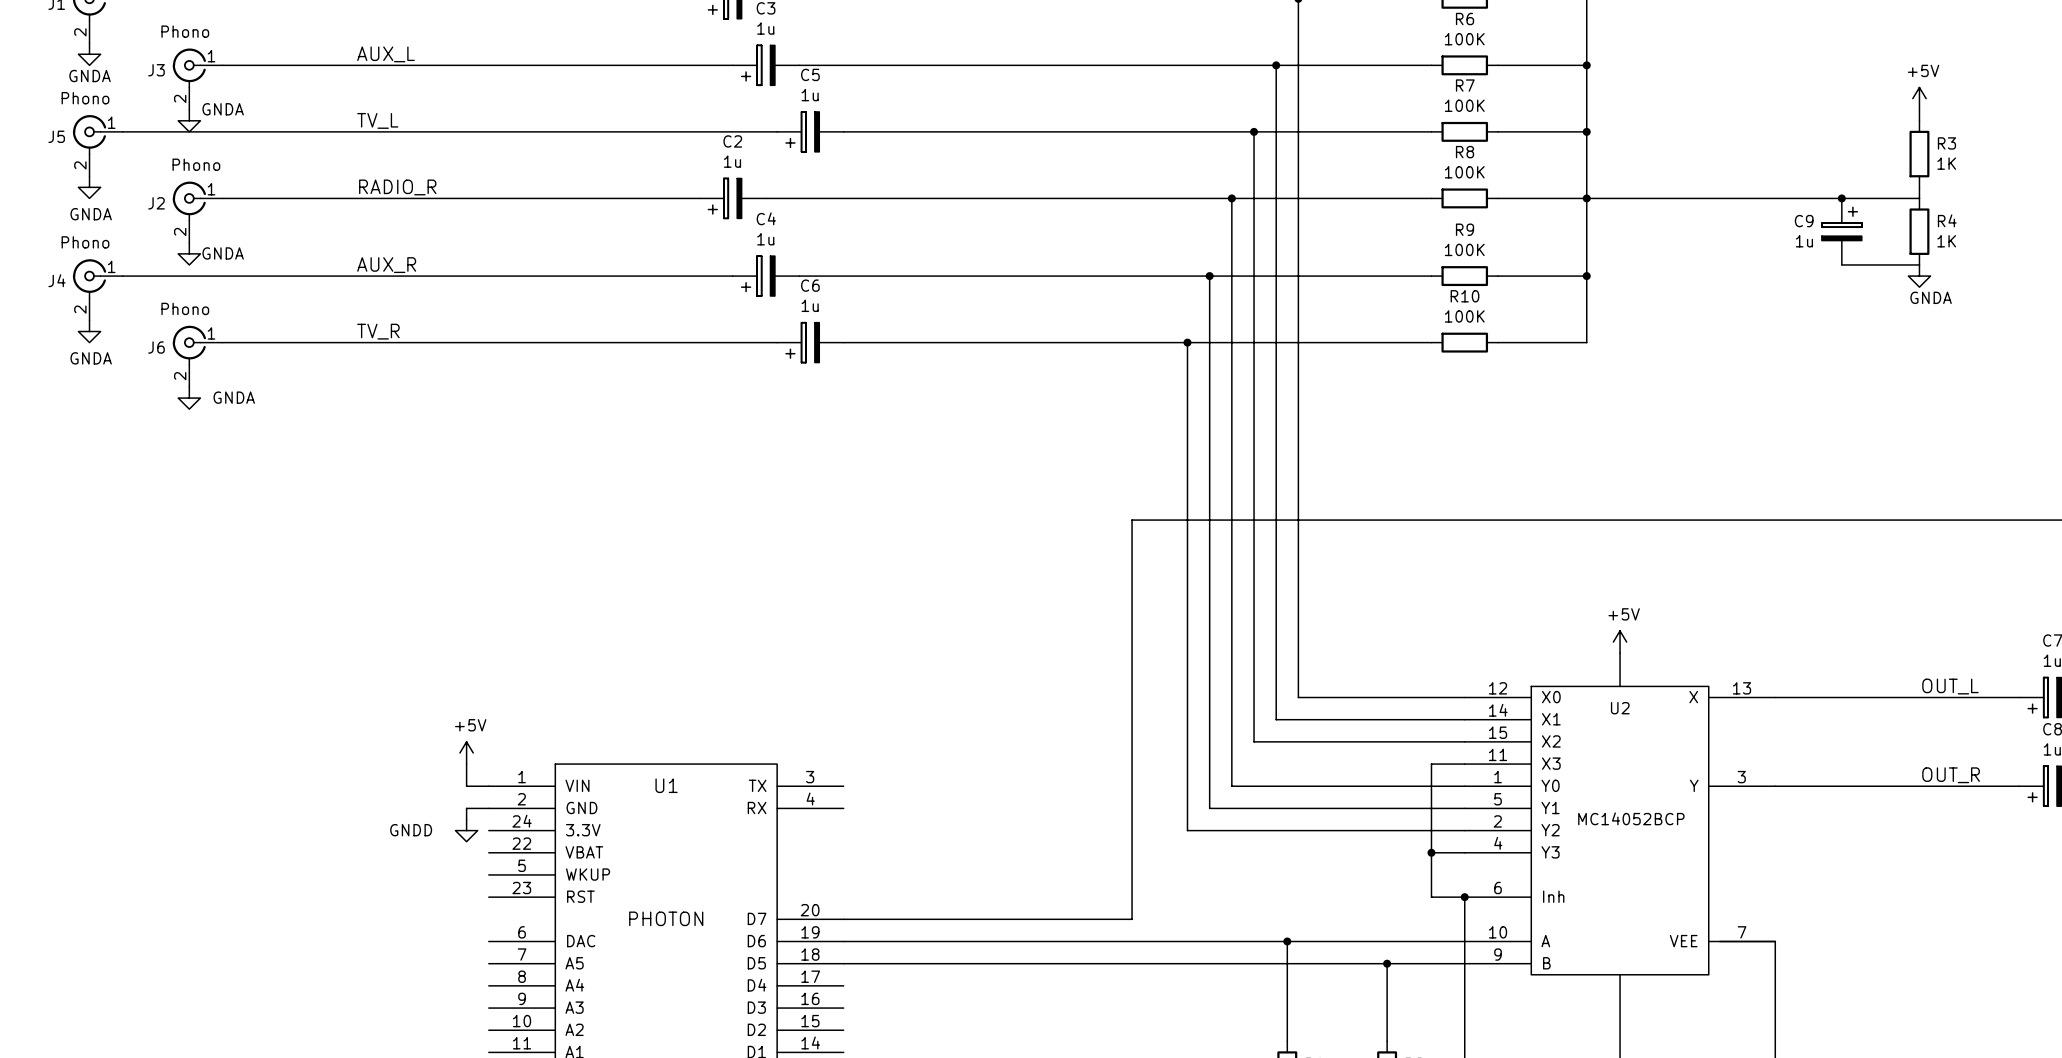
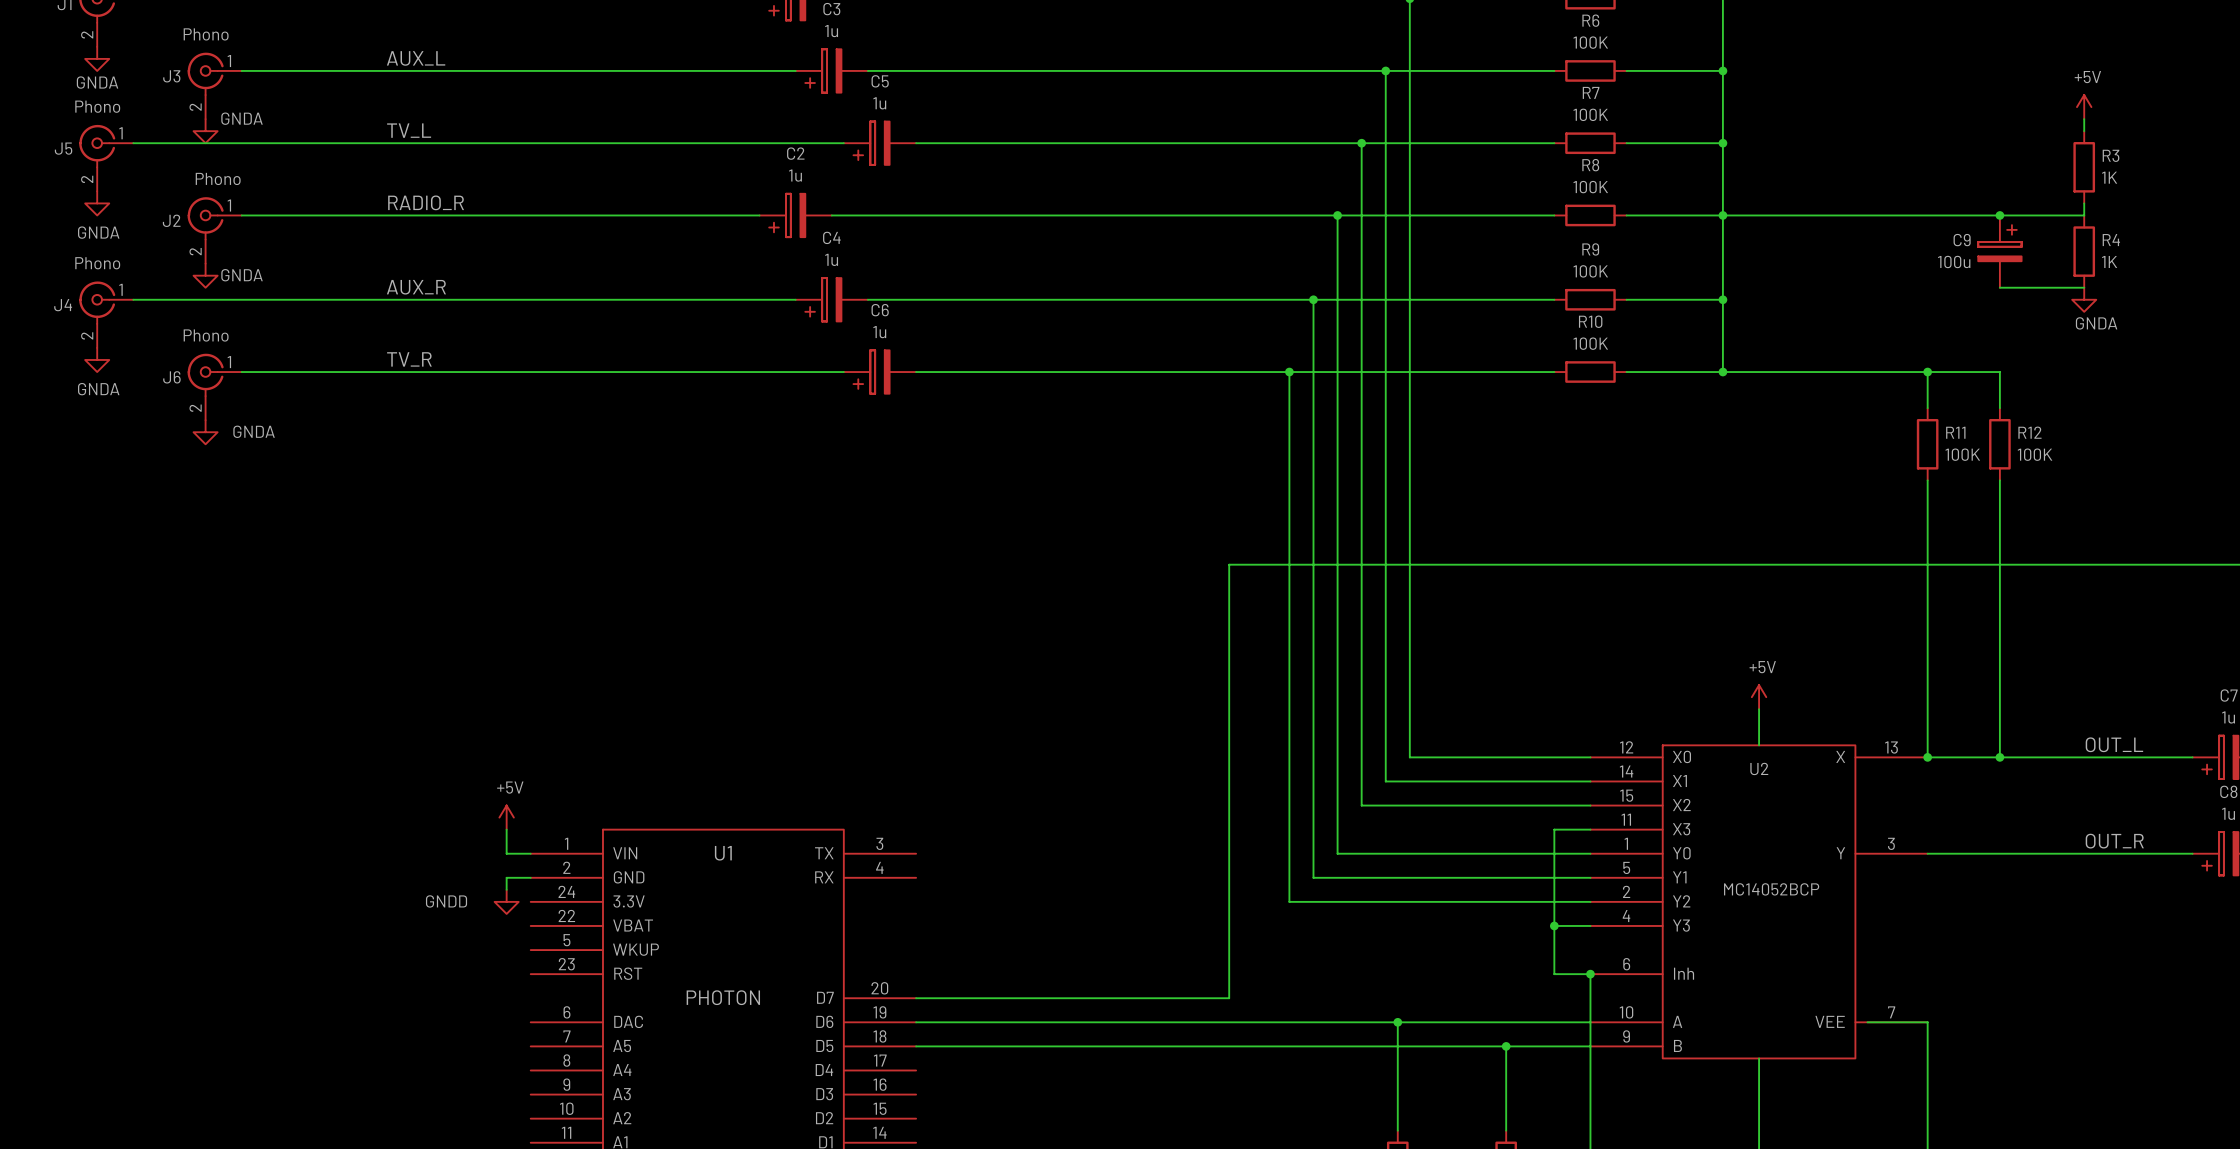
C9 value: 1u (1804, 241) -> 100u (1954, 261)
wire: none -> (1722, 372) (1999, 372) (1999, 408)
junction: none -> (1722, 372)
wire: none -> (1927, 372) (1927, 408)
junction: none -> (1927, 372)
R11: none -> 100K (1927, 444)
R12: none -> 100K (1999, 444)
wire: none -> (1927, 480) (1927, 757)
wire: none -> (1999, 480) (1999, 757)
junction: none -> (1927, 757)
junction: none -> (1999, 757)

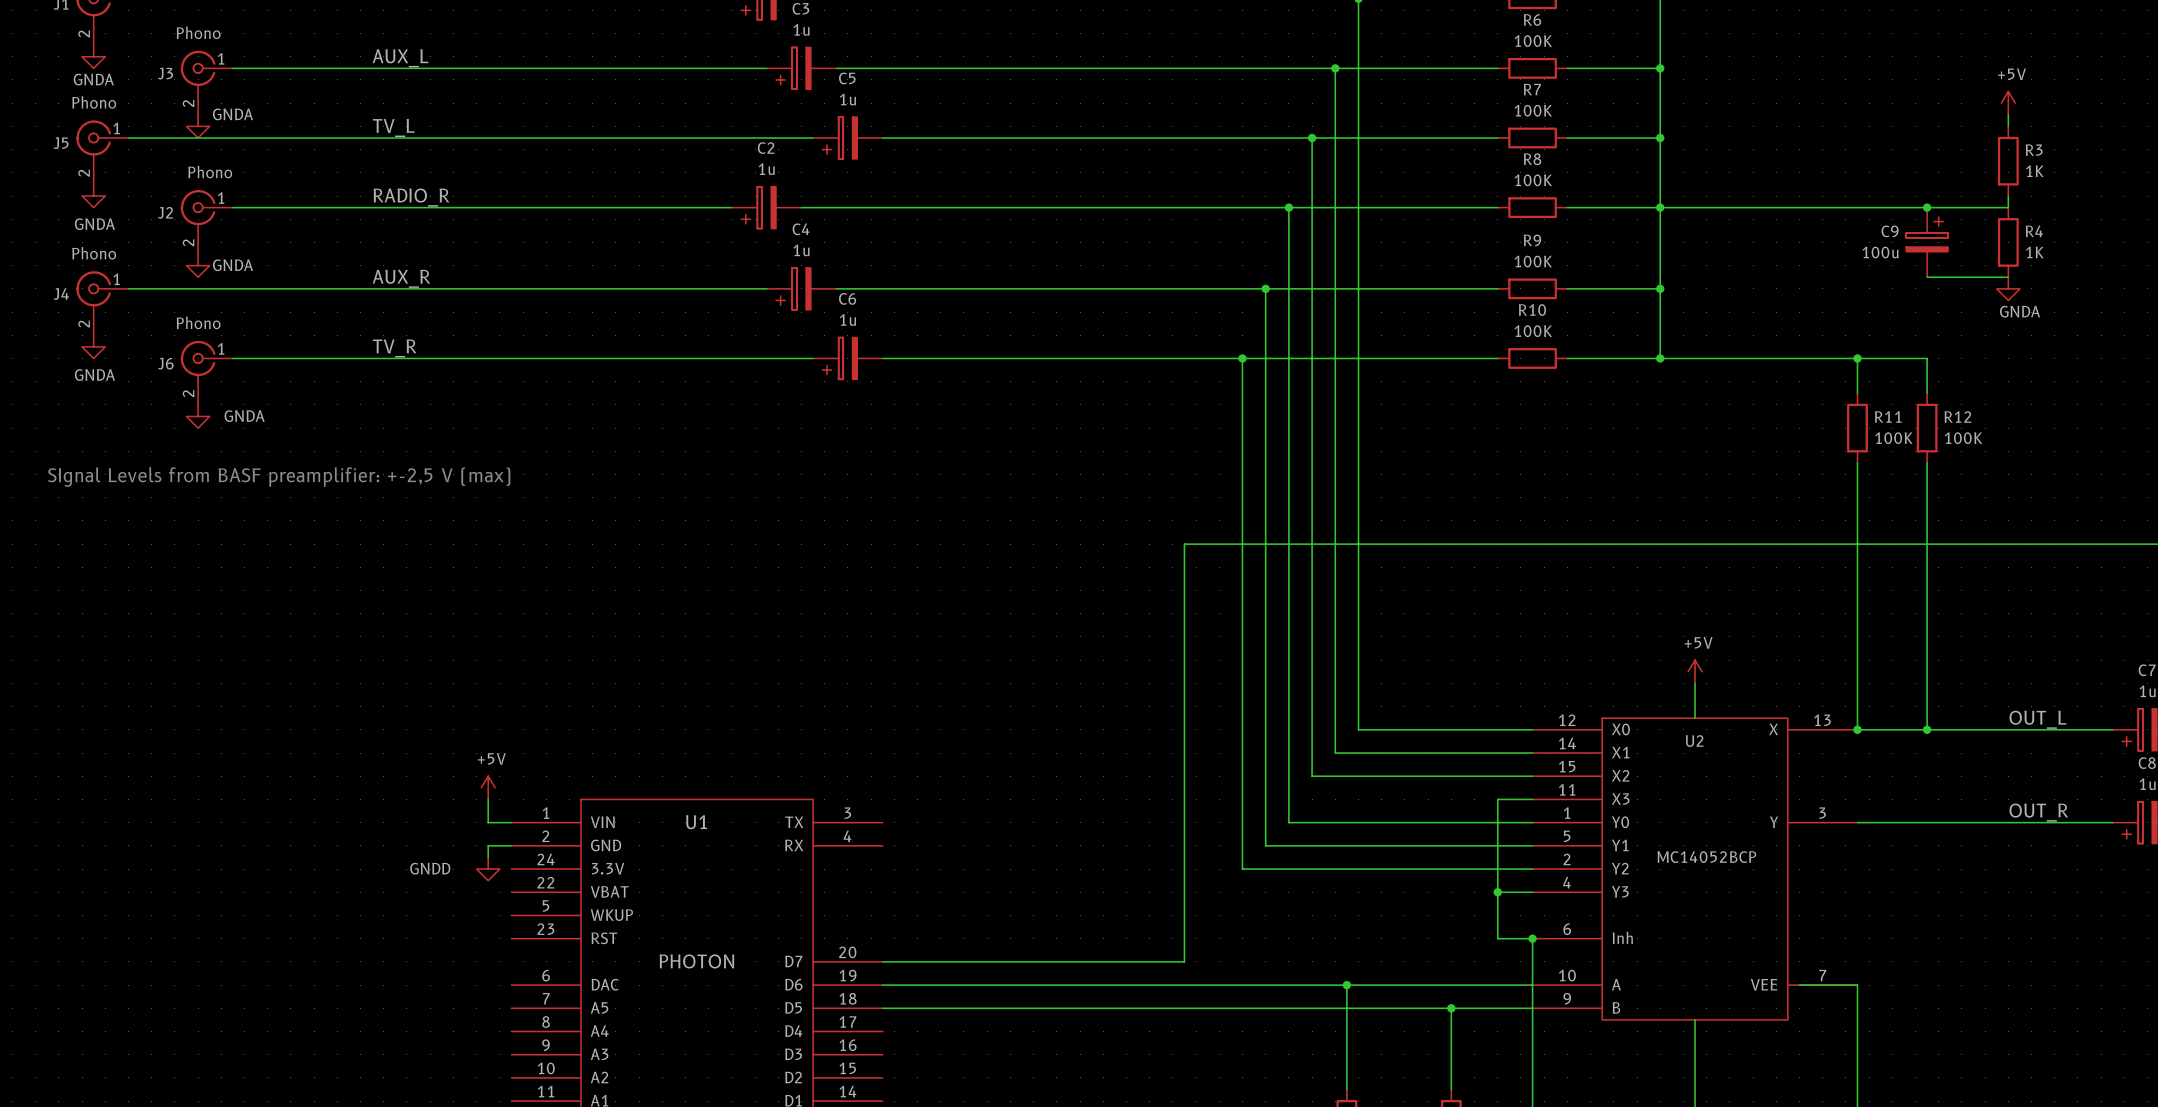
text: none -> SIgnal Levels from BASF preamplifier: +-2,5 V (max) (279, 477)

